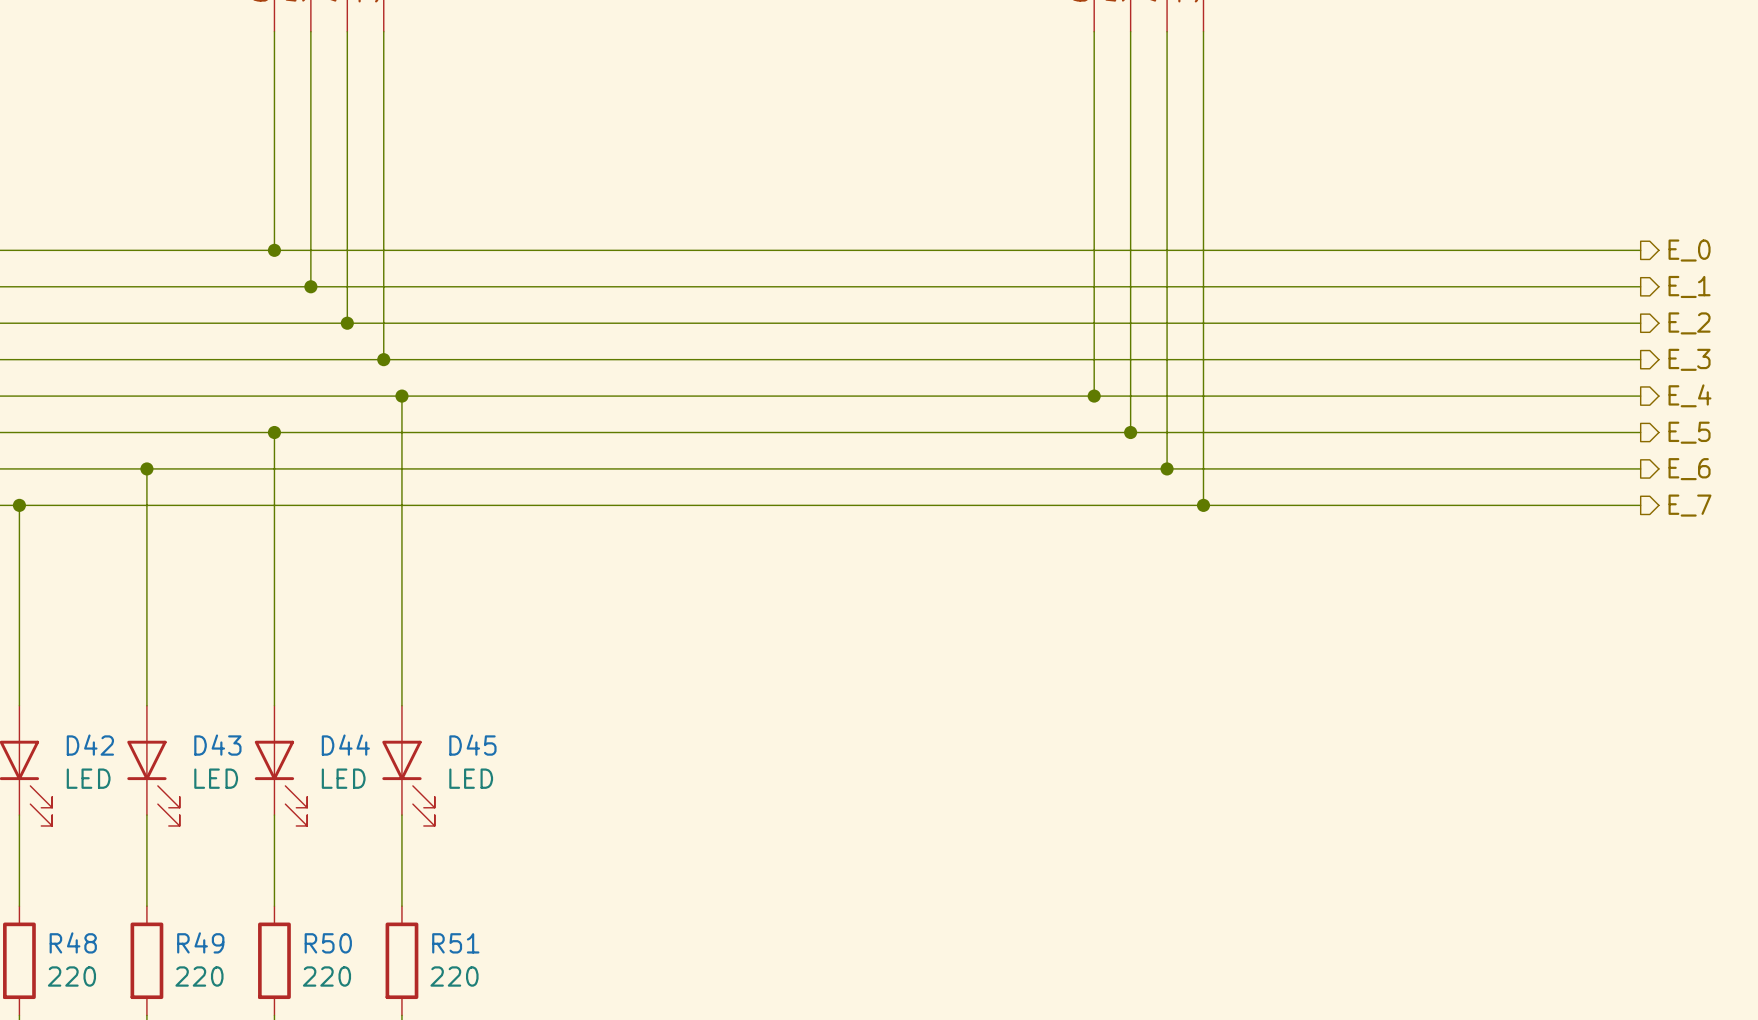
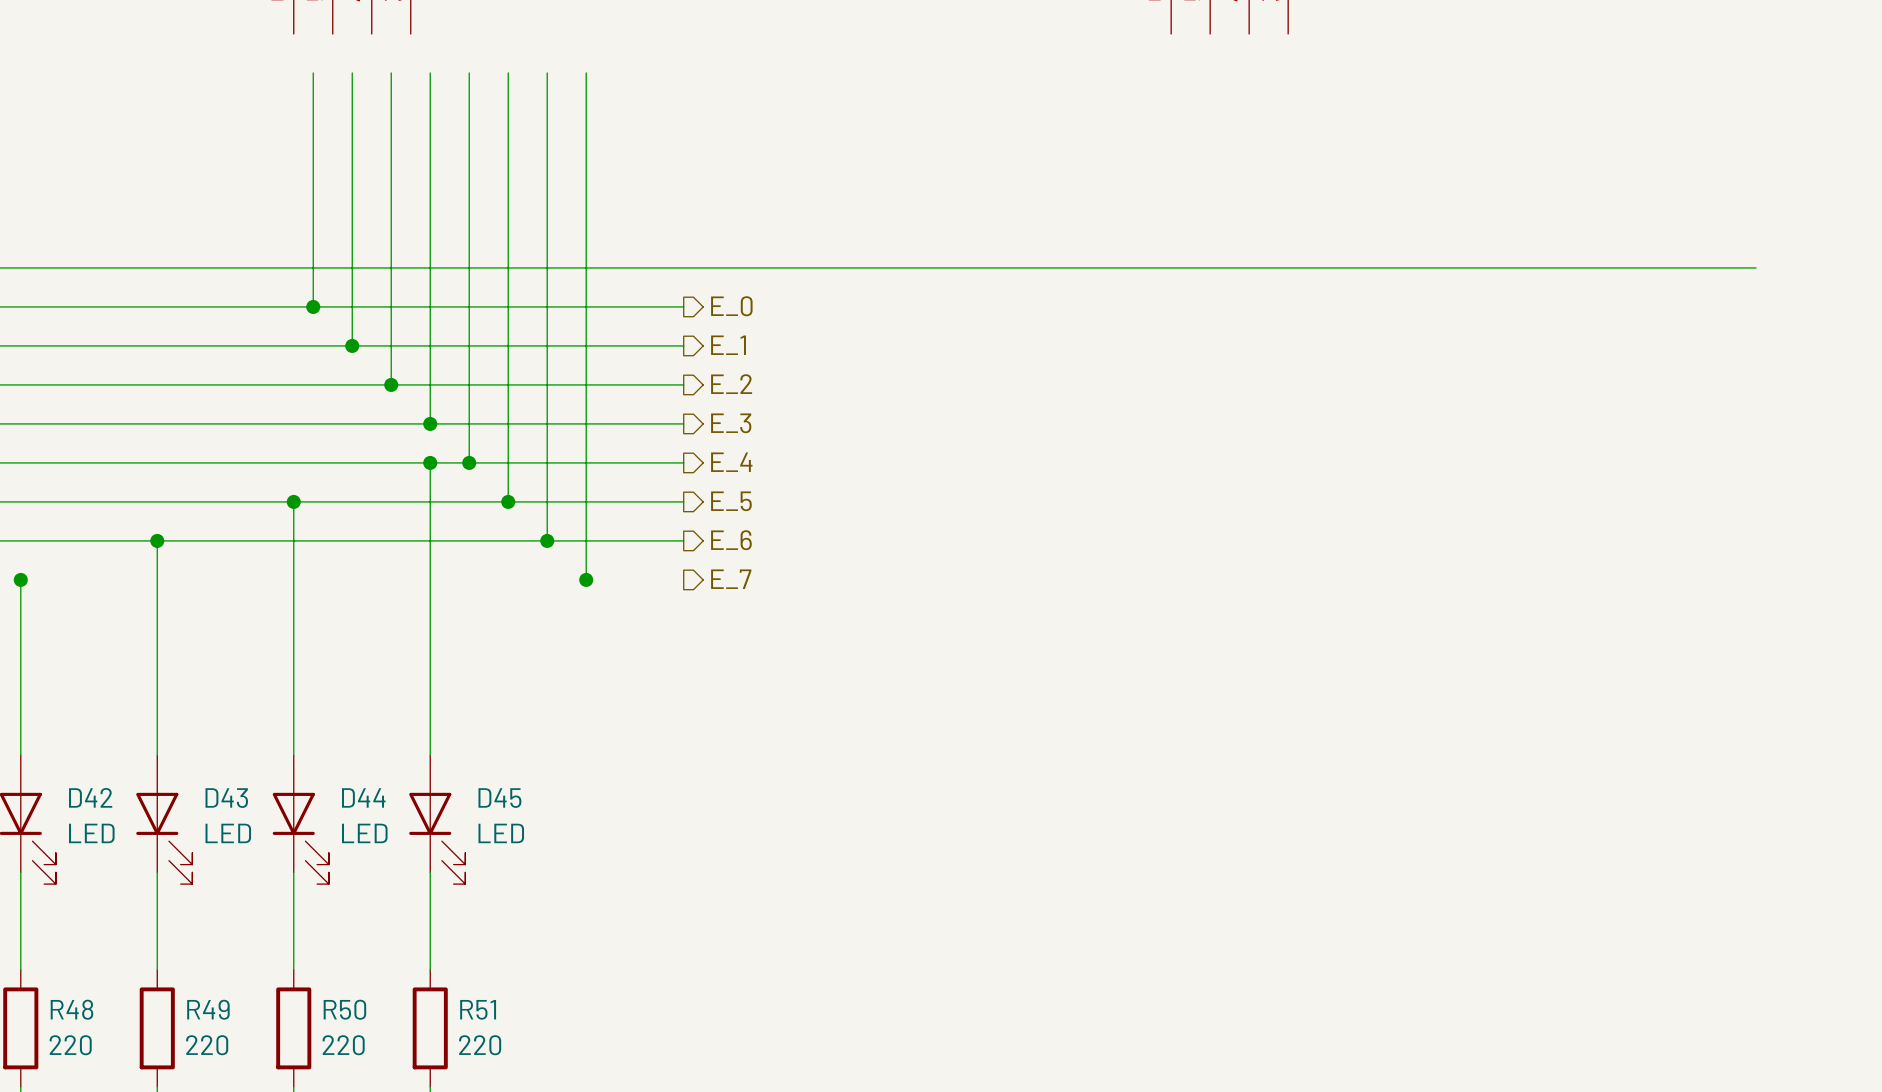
wire: (274, 31) (274, 250) -> (313, 72) (313, 306)
wire: (310, 31) (310, 286) -> (352, 72) (352, 345)
wire: (347, 31) (347, 323) -> (391, 72) (391, 384)
wire: (383, 31) (383, 359) -> none
wire: (1094, 31) (1094, 396) -> none
wire: (1130, 31) (1130, 432) -> none
wire: (1167, 31) (1167, 468) -> none
wire: (1203, 31) (1203, 505) -> none
wire: none -> (469, 72) (469, 462)
wire: none -> (508, 72) (508, 501)
wire: none -> (547, 72) (547, 540)
wire: none -> (586, 72) (586, 579)
junction: (274, 250) -> none
hierarchical label: E_0 (1689, 250) -> none
junction position: (310, 286) -> (313, 306)
wire: (638, 286) (1640, 286) -> none
hierarchical label: none -> E_0 (731, 306)
hierarchical label: E_1 (1689, 286) -> none
junction position: (347, 323) -> (352, 345)
wire: (638, 323) (1640, 323) -> none
hierarchical label: none -> E_1 (728, 345)
hierarchical label: E_2 (1689, 323) -> none
junction position: (383, 359) -> (391, 384)
wire: (638, 359) (1640, 359) -> none
hierarchical label: none -> E_2 (731, 384)
hierarchical label: E_3 (1689, 359) -> none
hierarchical label: E_4 (1689, 395) -> none
wire: (401, 396) (401, 432) -> (430, 423) (430, 72)
wire: (638, 396) (1640, 396) -> none
hierarchical label: none -> E_3 (731, 423)
junction: (1094, 396) -> none
wire: (274, 432) (274, 468) -> none
junction position: (274, 432) -> (293, 501)
junction: none -> (430, 462)
junction: none -> (469, 462)
wire: (638, 432) (1640, 432) -> none
hierarchical label: none -> E_4 (731, 462)
junction: (1130, 432) -> none
hierarchical label: E_5 (1689, 432) -> none
wire: (146, 468) (146, 505) -> none
junction position: (146, 468) -> (157, 540)
junction: none -> (508, 501)
wire: (638, 468) (1640, 468) -> none
junction: (1167, 468) -> none
hierarchical label: none -> E_5 (731, 501)
hierarchical label: E_6 (1689, 469) -> none
wire: (19, 505) (19, 541) -> none
junction position: (19, 505) -> (20, 579)
junction: none -> (547, 540)
wire: (638, 505) (1640, 505) -> none
hierarchical label: none -> E_6 (731, 540)
junction: (1203, 505) -> none
hierarchical label: E_7 (1689, 505) -> none
junction: none -> (586, 579)
hierarchical label: none -> E_7 (731, 579)

